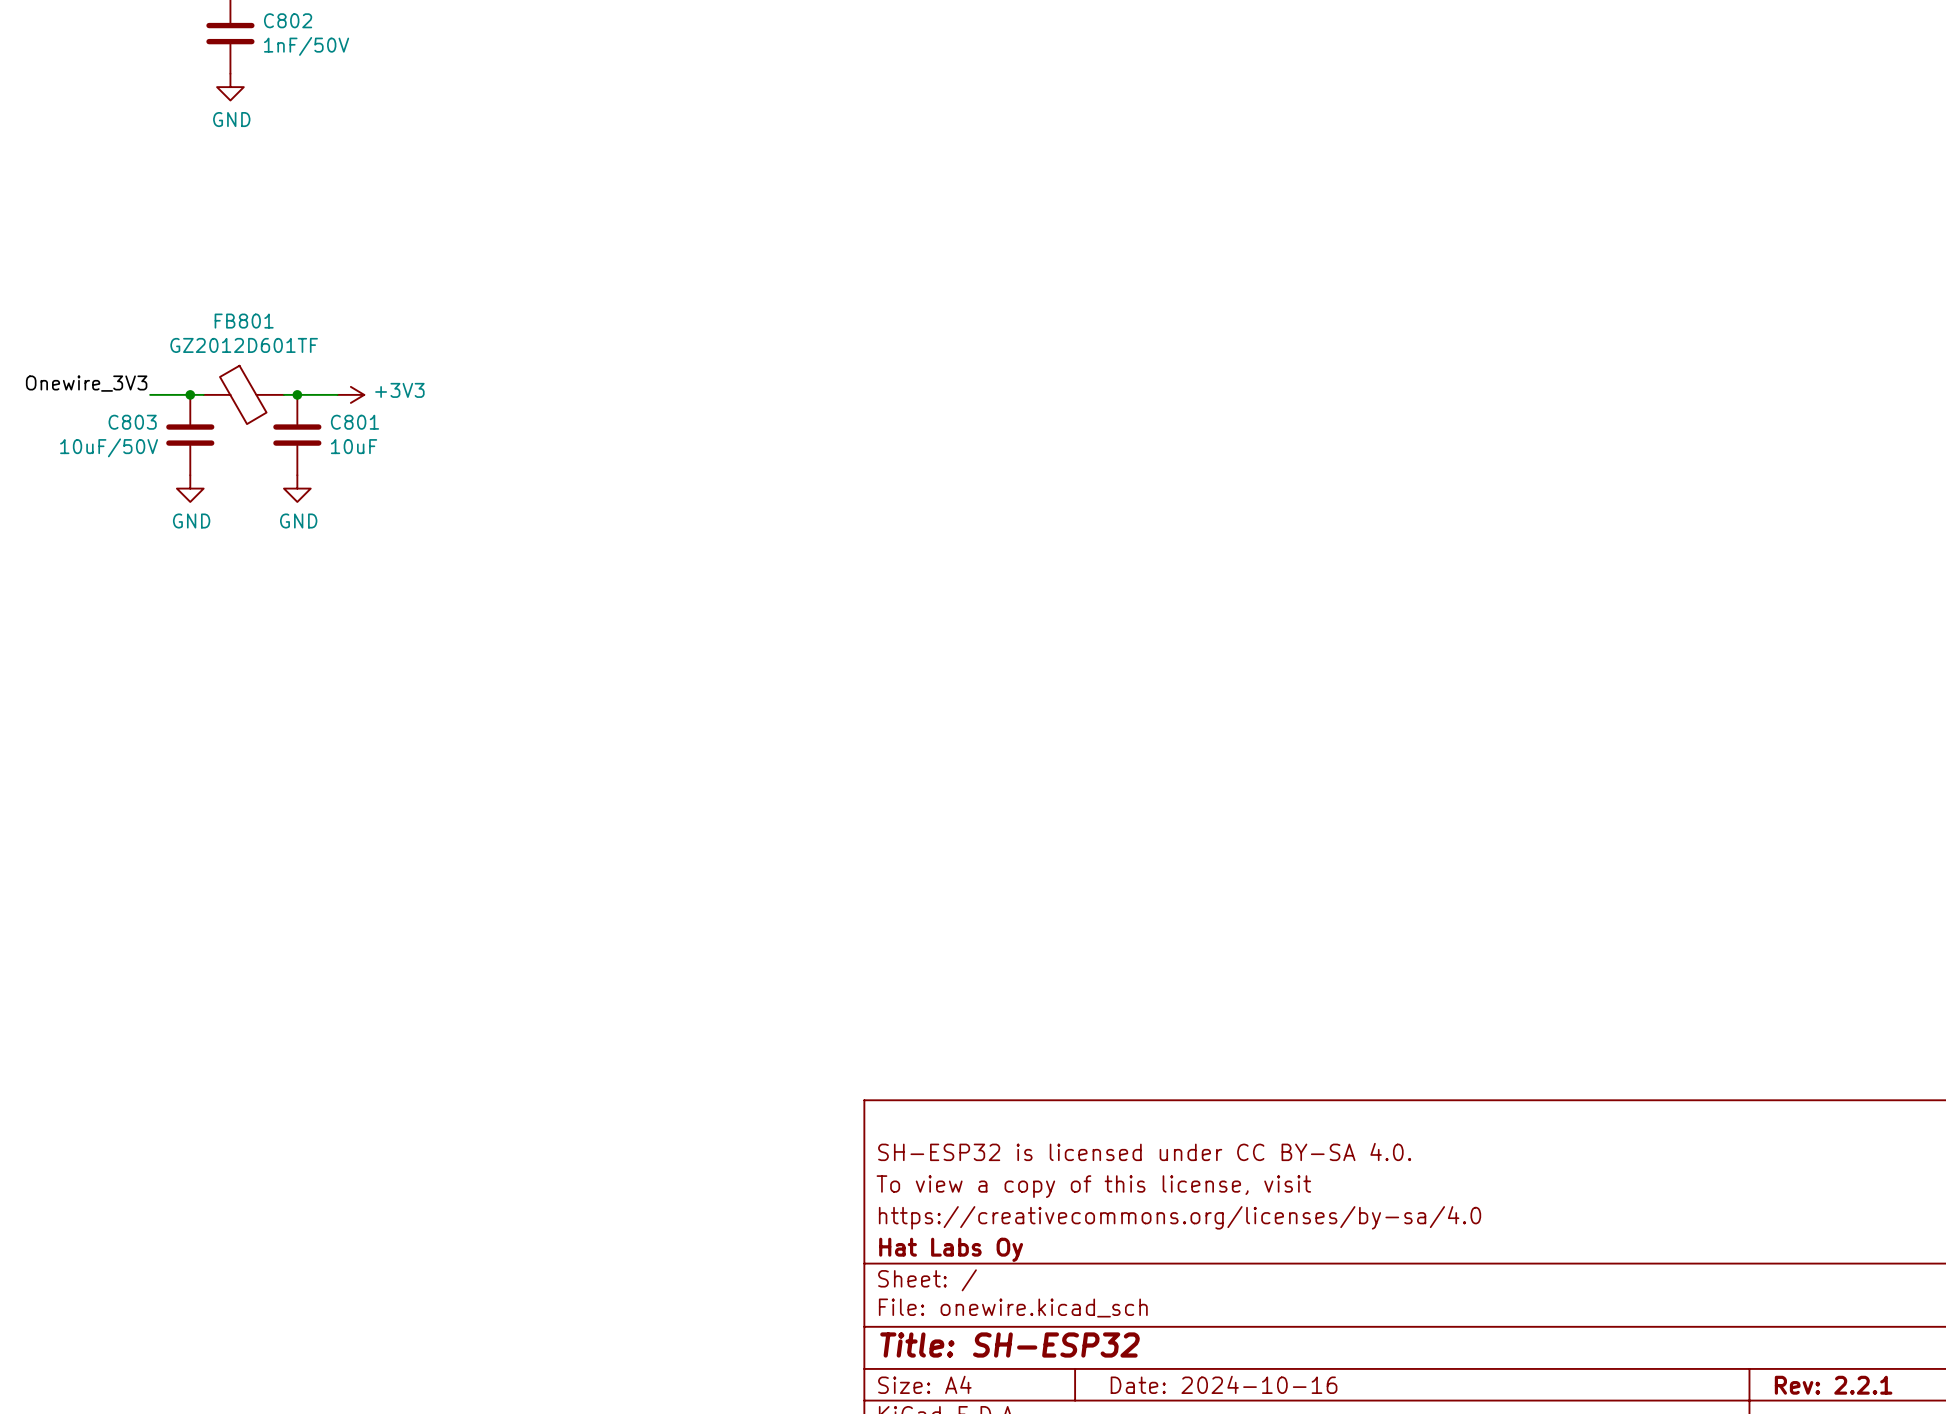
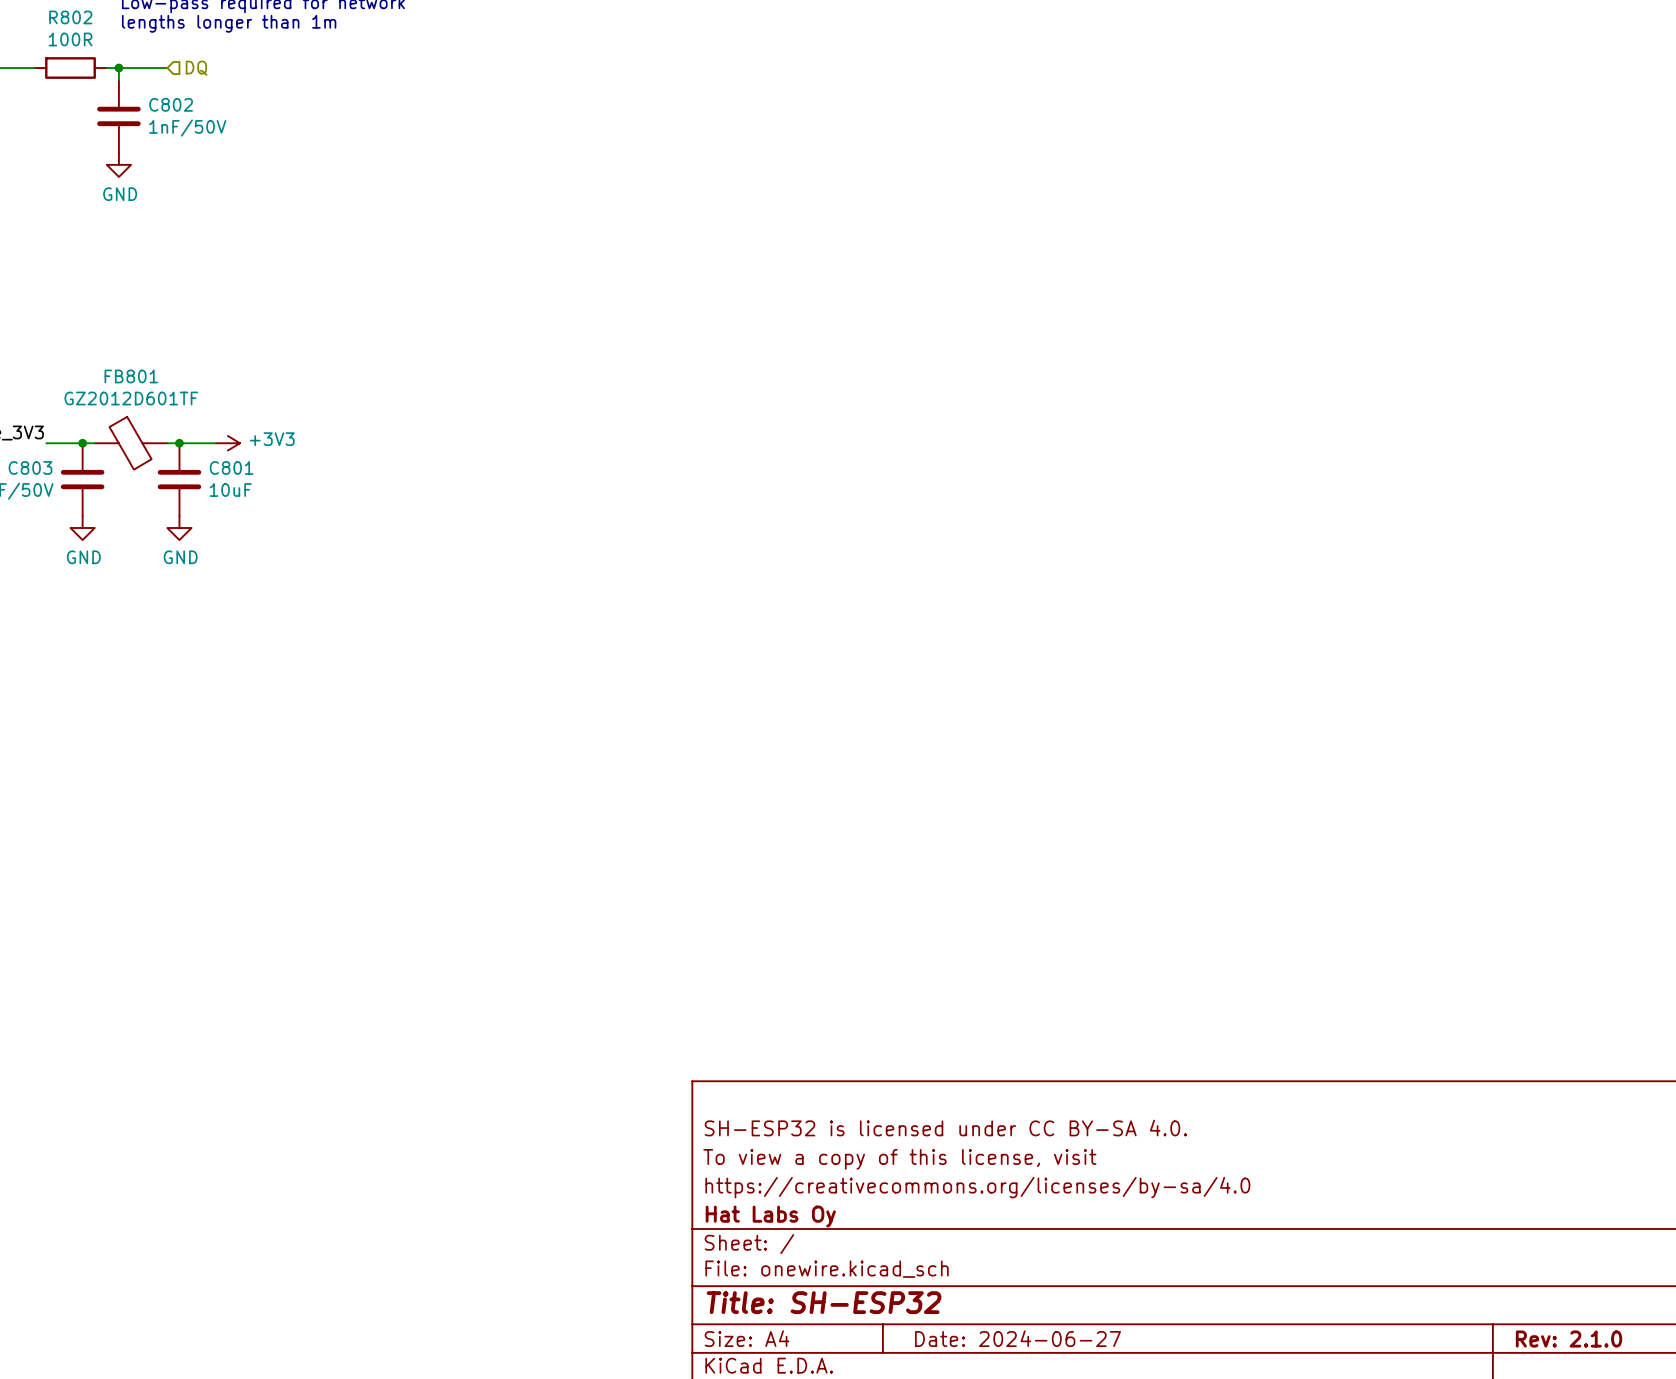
title block: Date: 2024-10-16 (1224, 1384) -> Date: 2024-06-27 (1018, 1338)
title block: Rev: 2.2.1 (1833, 1385) -> Rev: 2.1.0 (1569, 1339)

